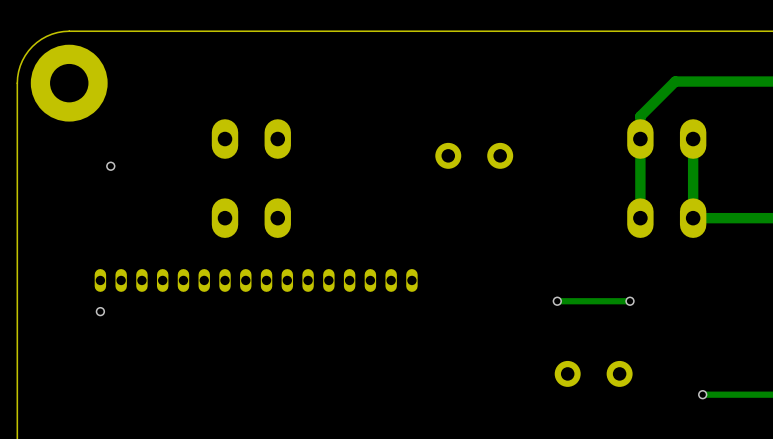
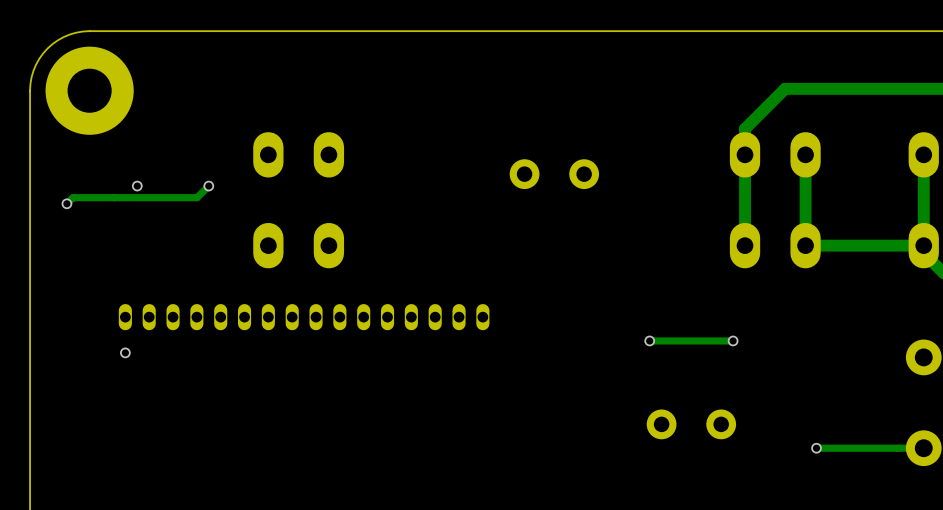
track: none -> (208, 186) (197, 197) (73, 197) (66, 203)
via: none -> (208, 186)
via: none -> (66, 203)

